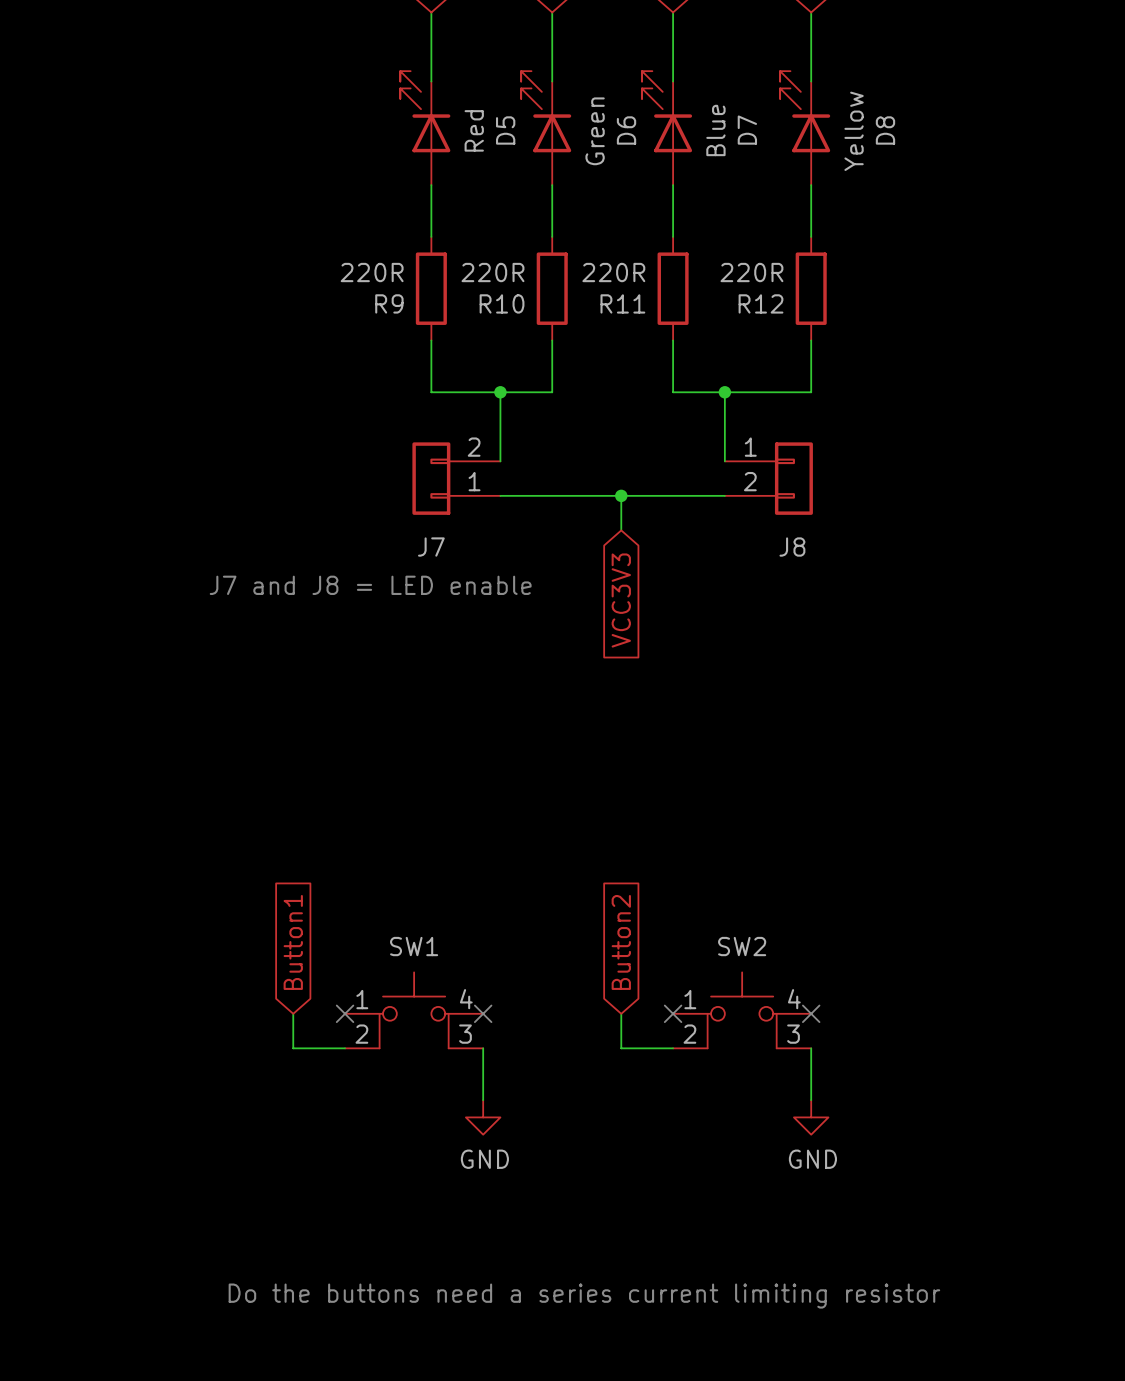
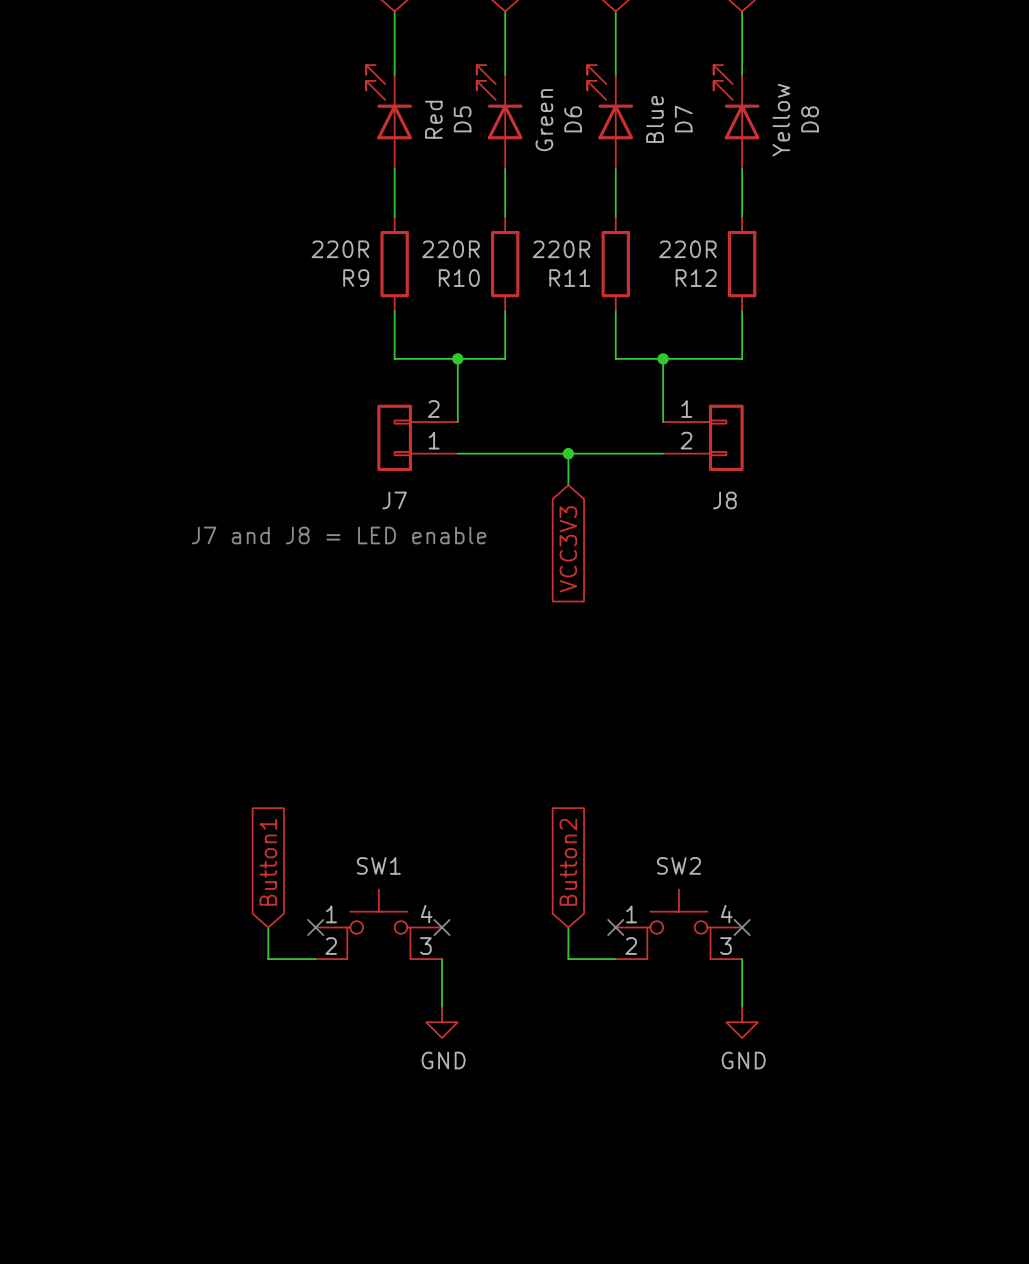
text: Do the buttons need a series current limiting resistor (584, 1296) -> none

